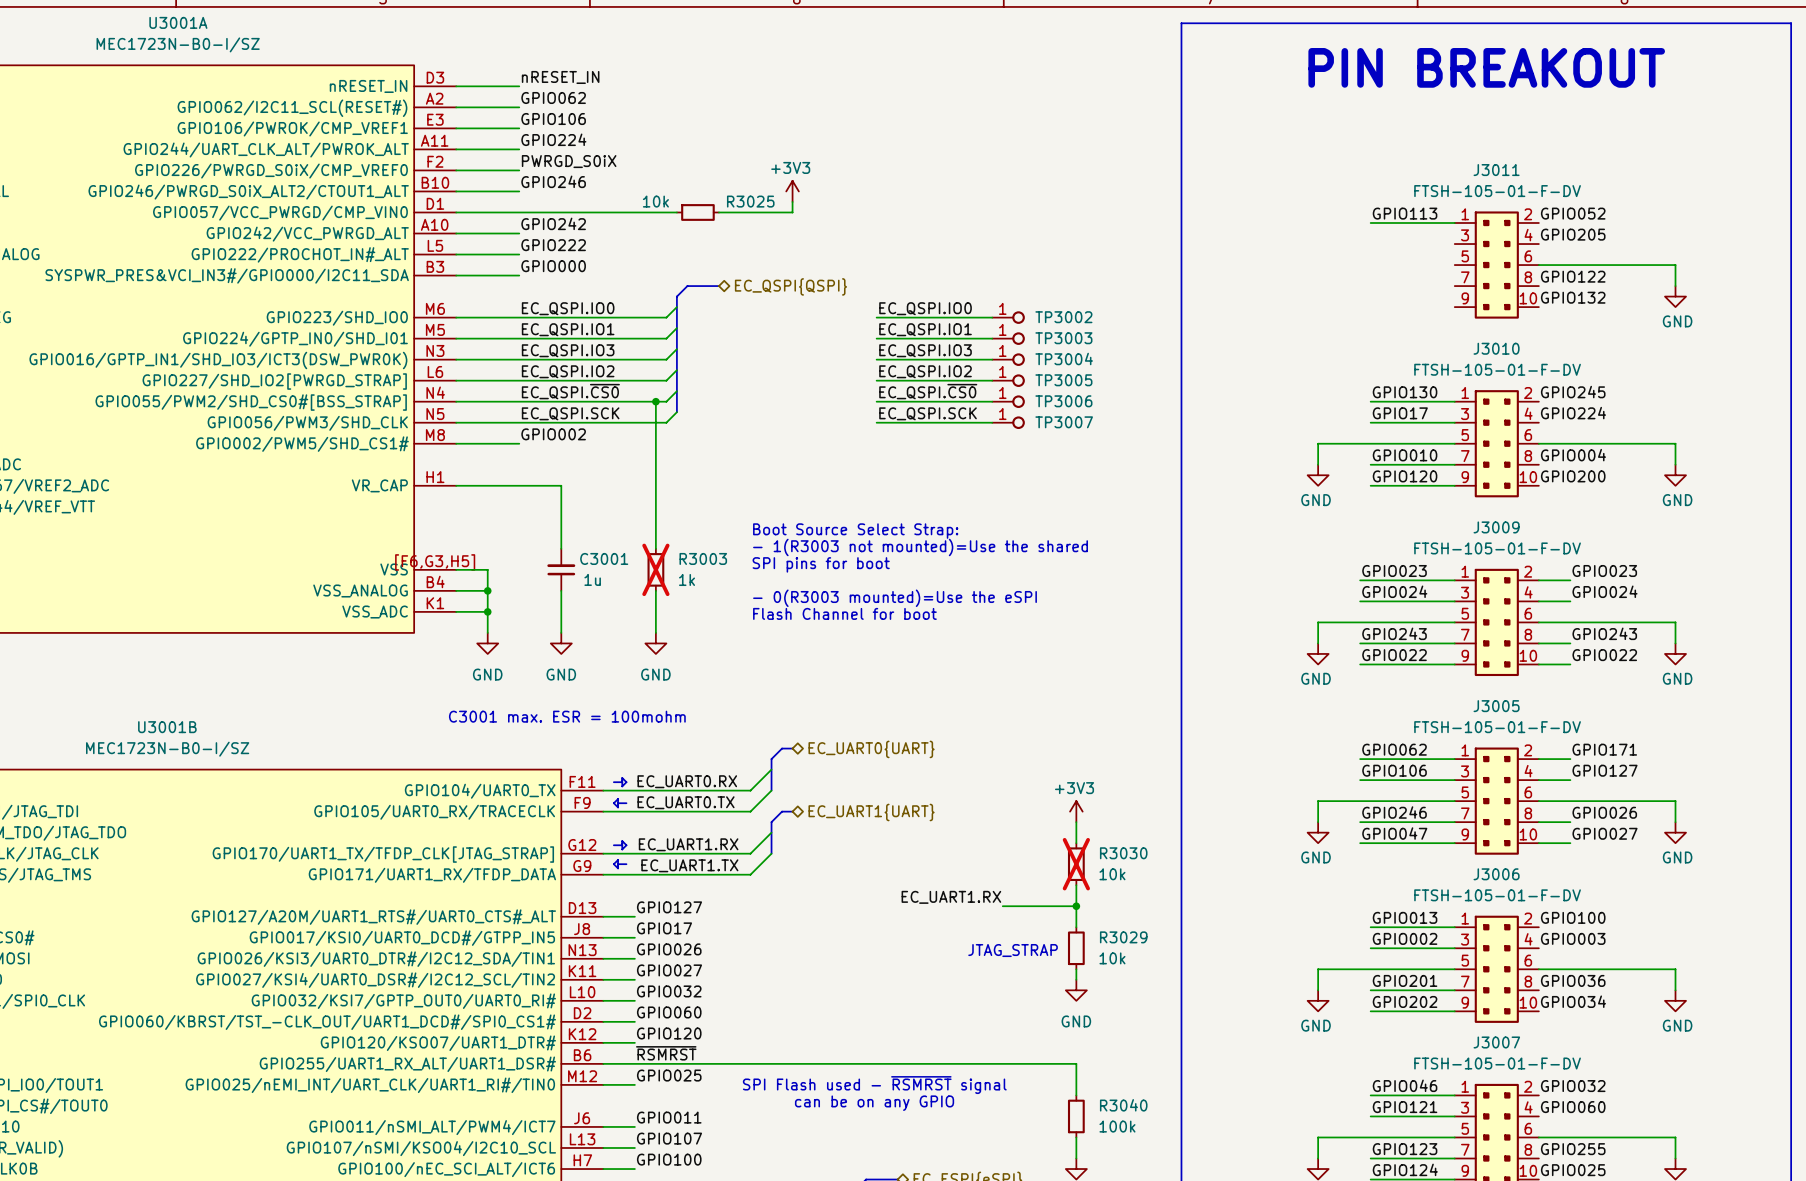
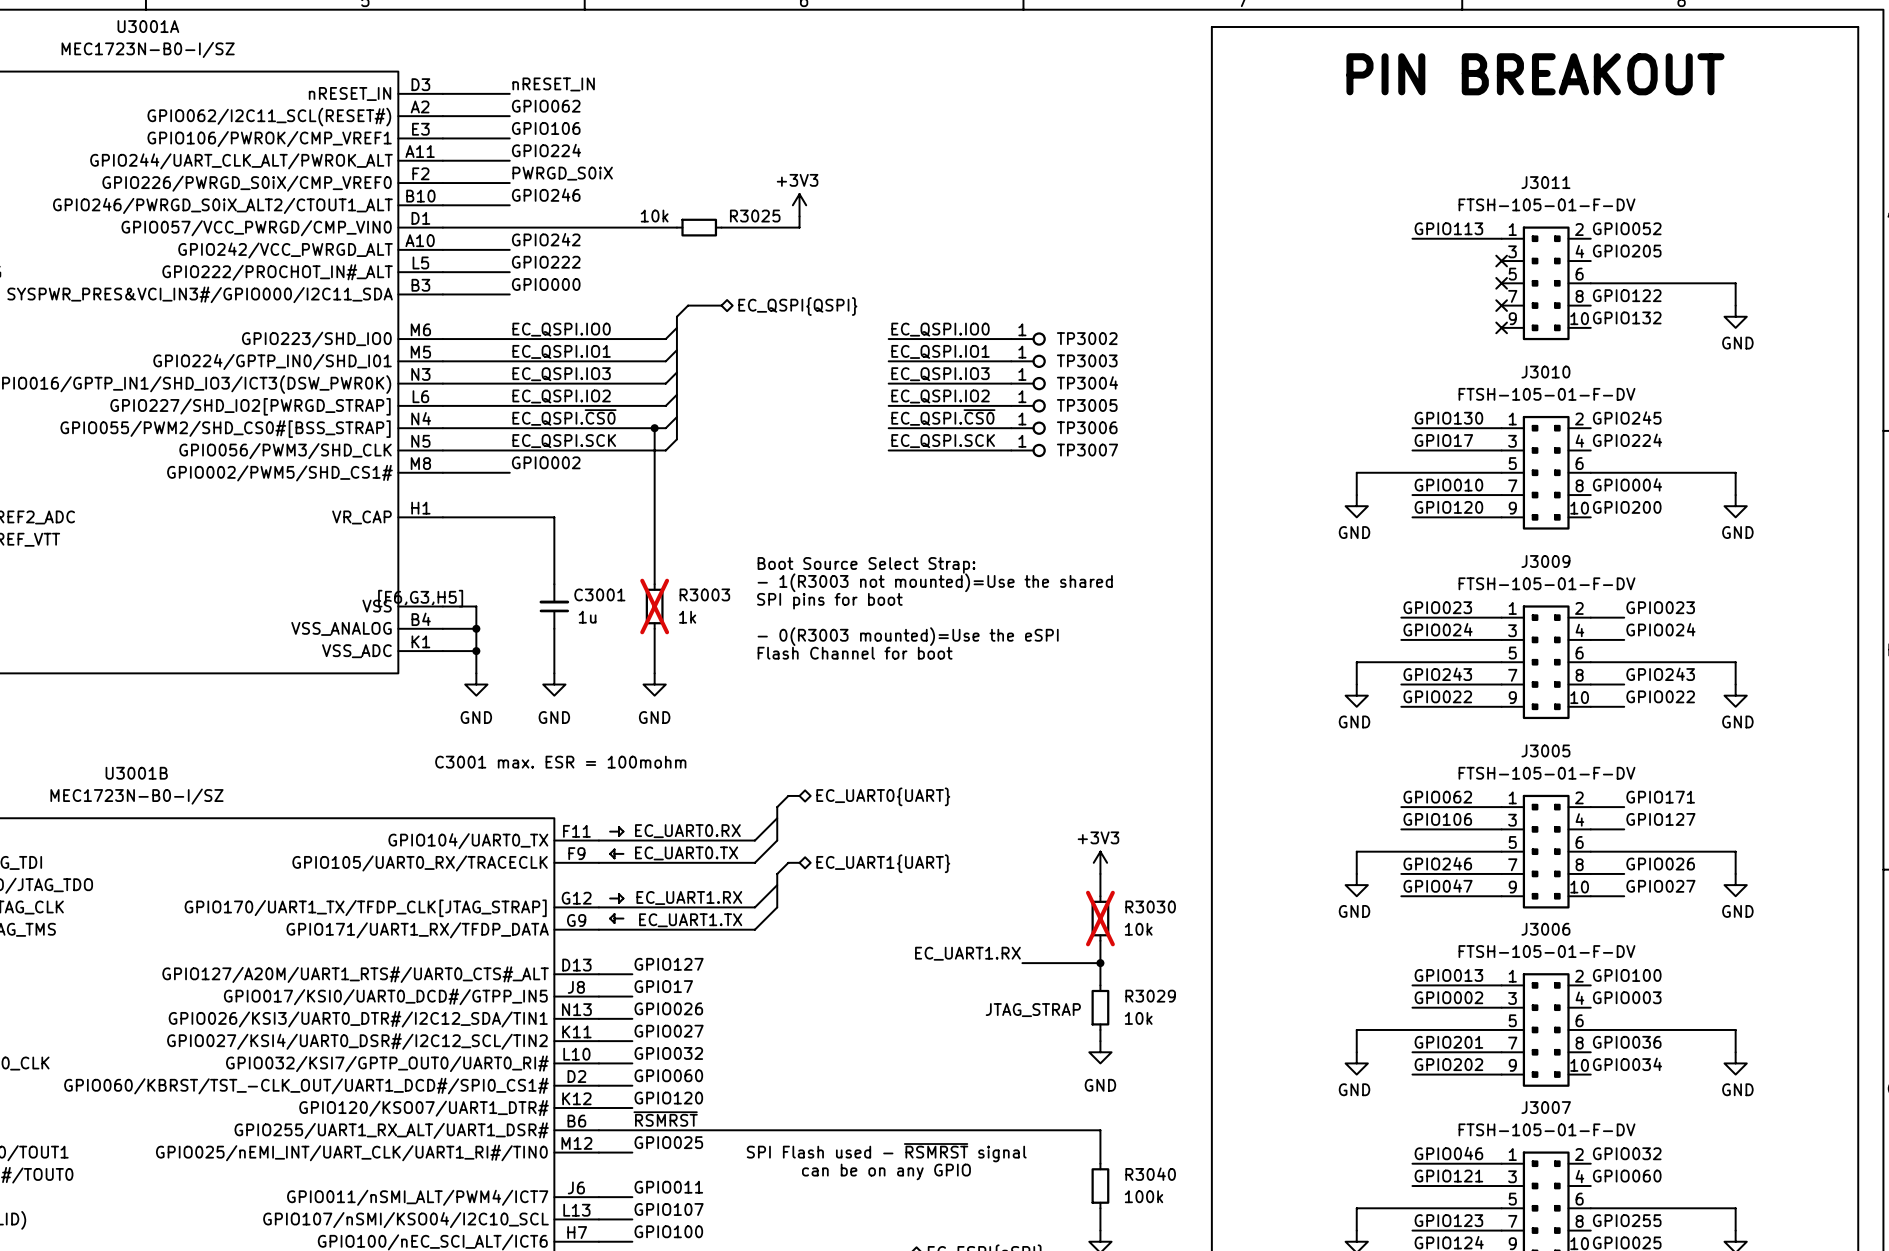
no-connect mark: none -> (1501, 261)
no-connect mark: none -> (1501, 283)
no-connect mark: none -> (1501, 305)
no-connect mark: none -> (1501, 327)

